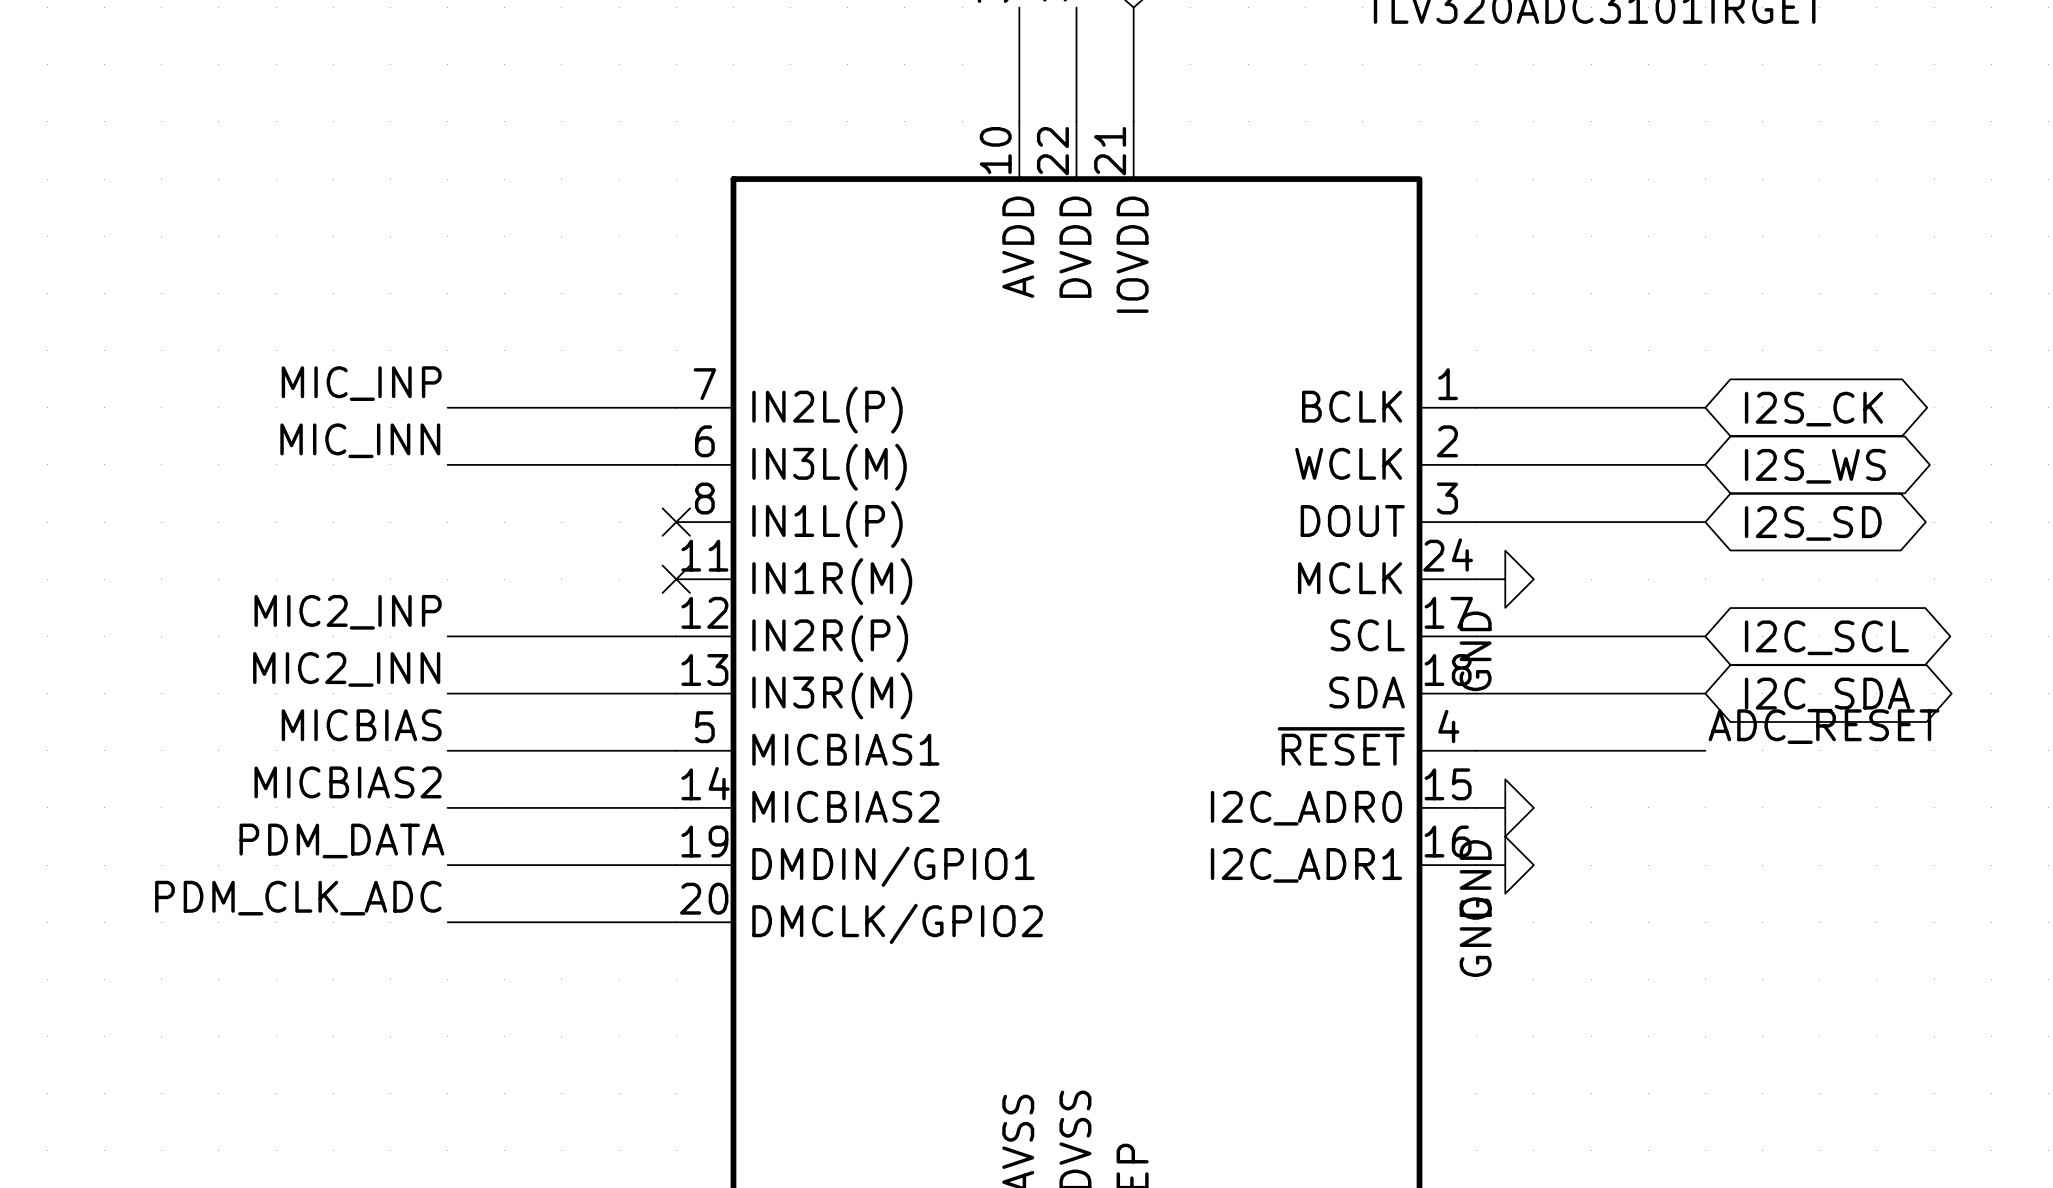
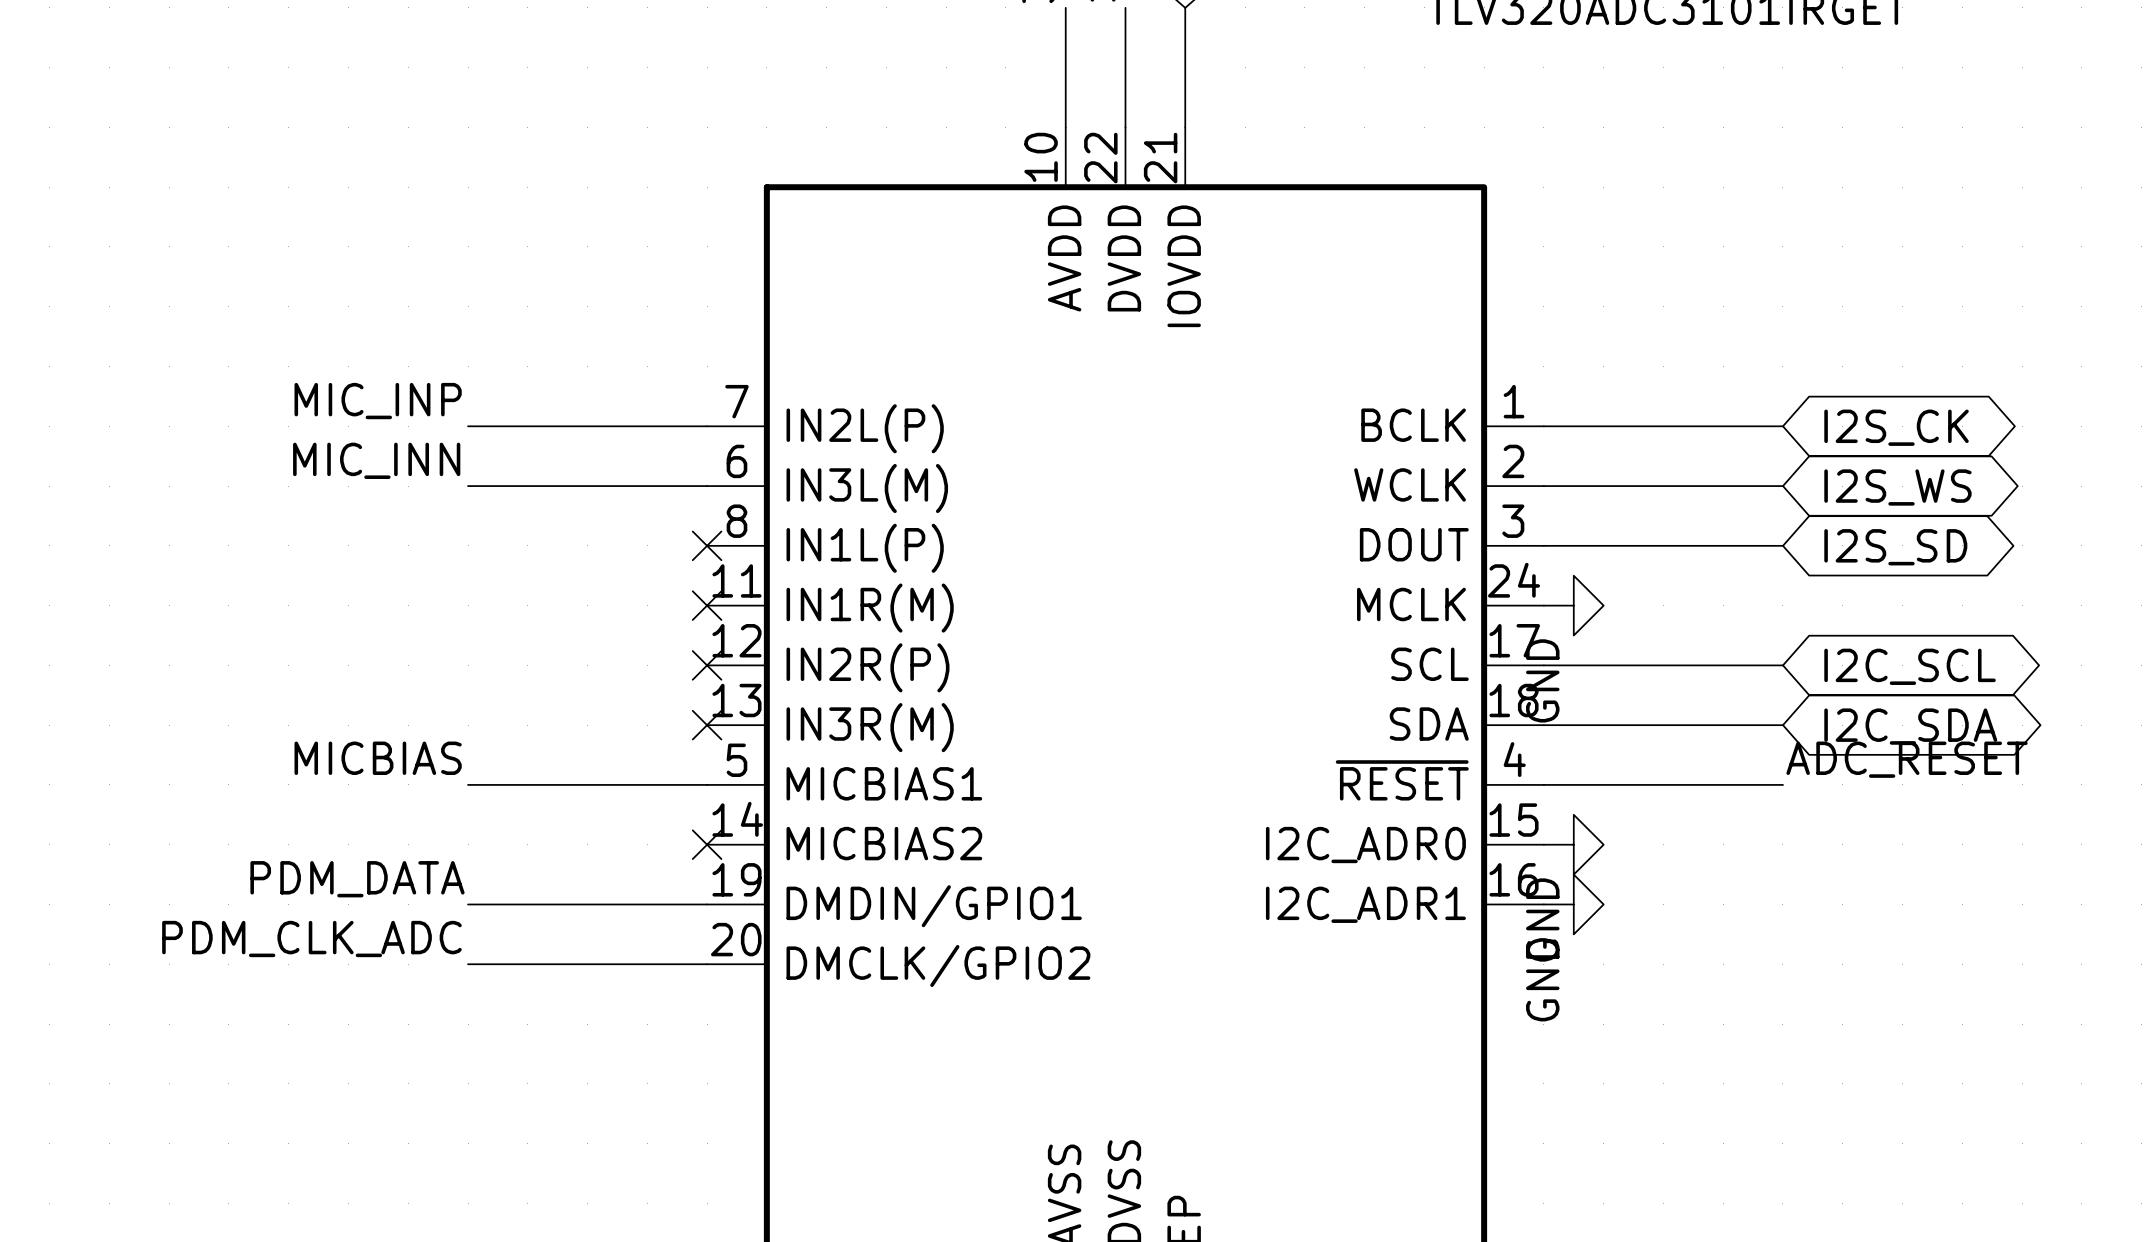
label: MIC2_INP (348, 612) -> none
wire: (447, 636) (676, 636) -> none
no-connect mark: none -> (707, 665)
label: MIC2_INN (346, 669) -> none
wire: (447, 693) (676, 693) -> none
no-connect mark: none -> (707, 725)
label: MICBIAS2 (348, 782) -> none
wire: (447, 807) (676, 807) -> none
no-connect mark: none -> (707, 844)

